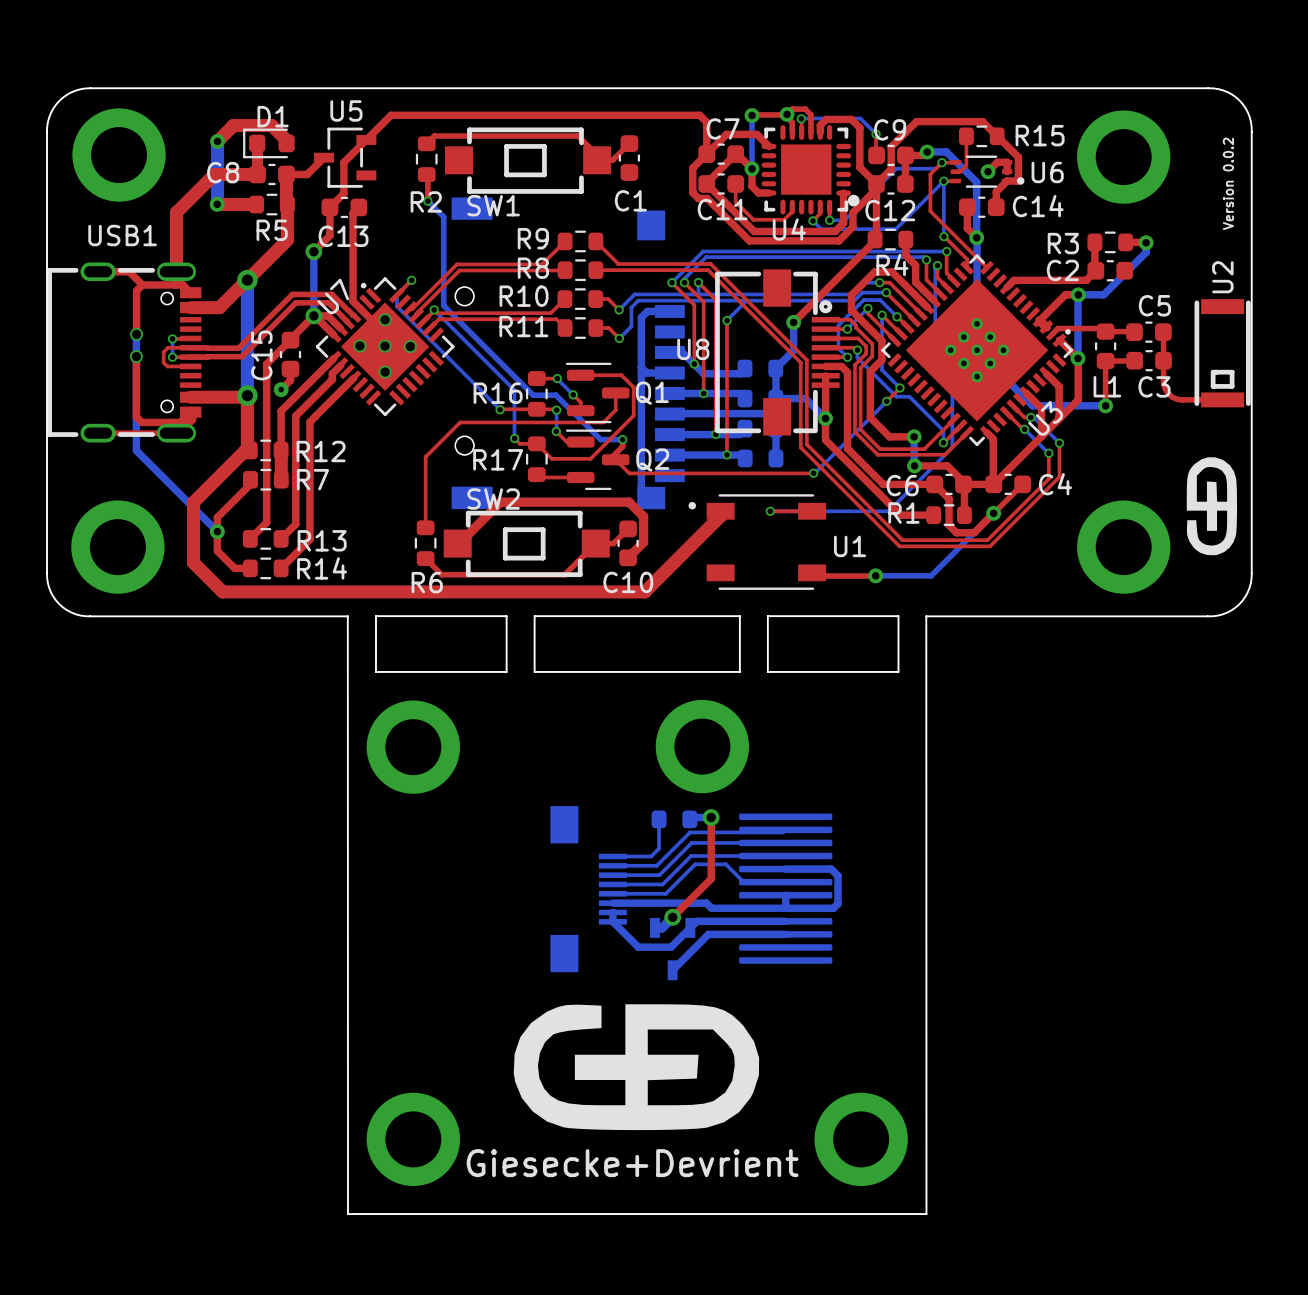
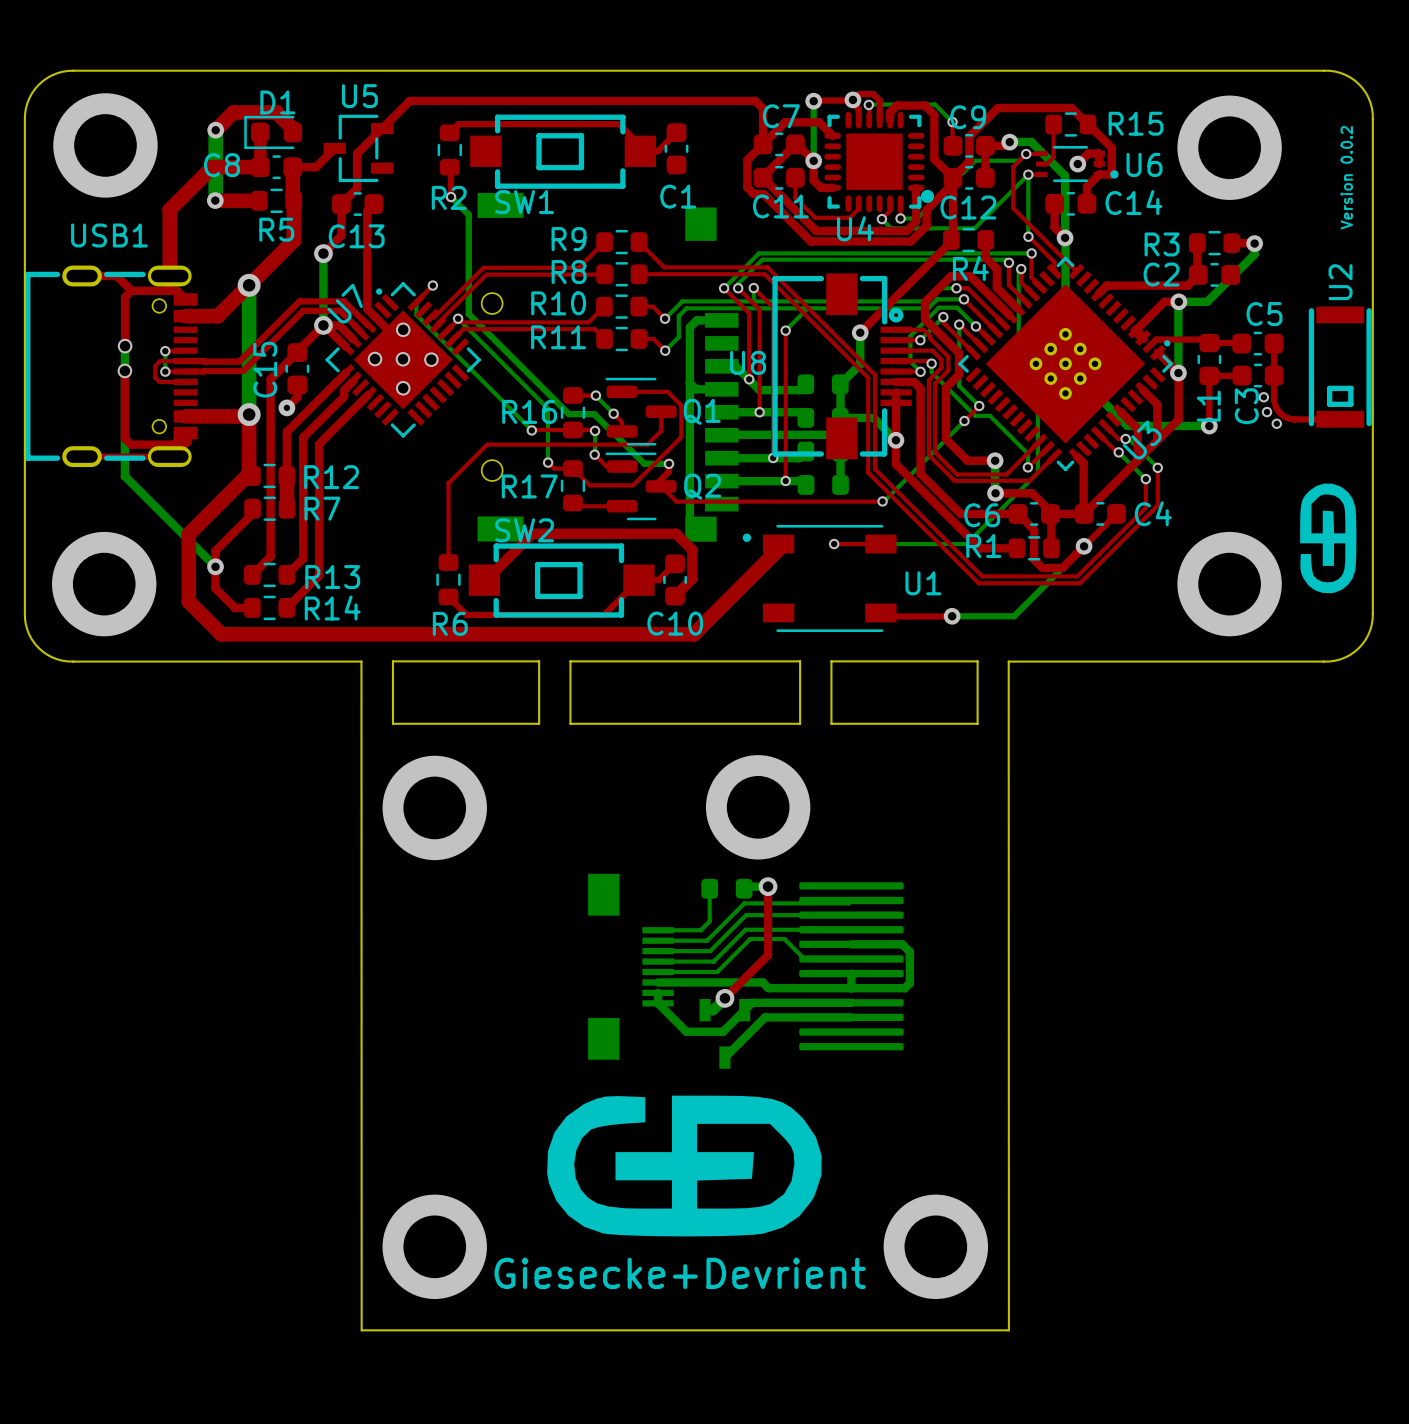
via: none -> (1263, 397)
L1 name rotation: 0° (1107, 386) -> 90° counterclockwise (1208, 406)
C3 name rotation: 0° (1154, 386) -> 90° counterclockwise (1246, 406)
via: none -> (1266, 412)
via: none -> (1276, 423)

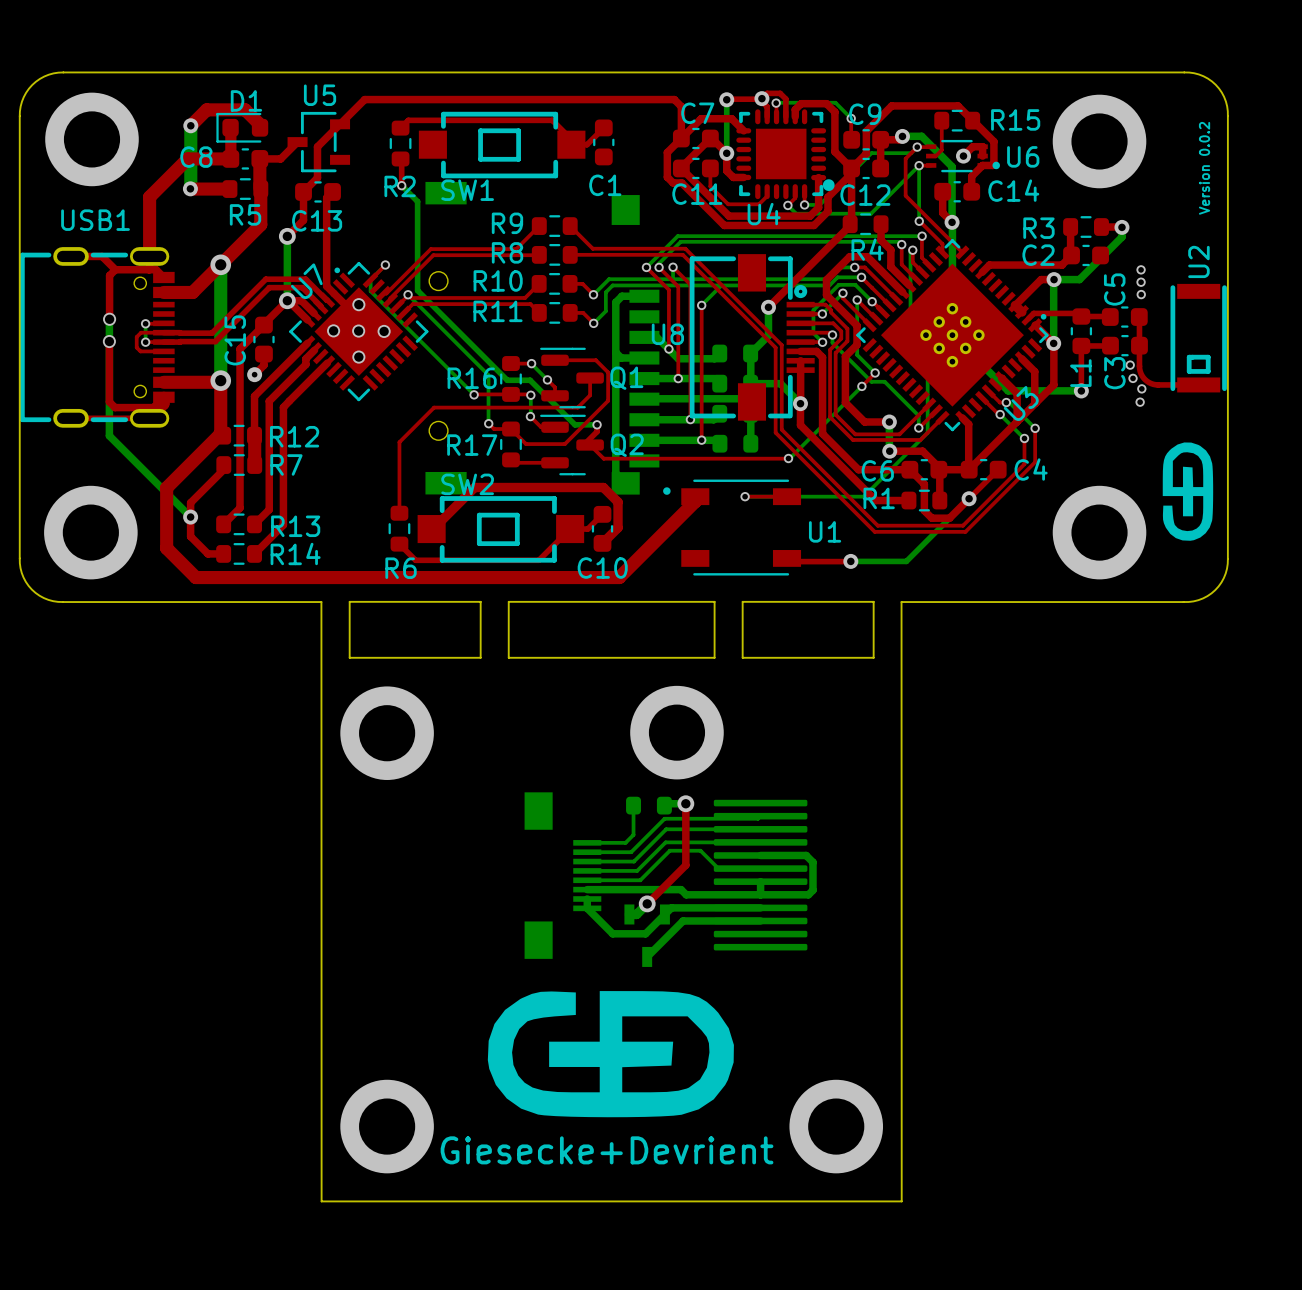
via: none -> (1141, 269)
via: none -> (1141, 282)
C5 name rotation: 0° (1264, 314) -> 90° counterclockwise (1114, 289)
via: none -> (1141, 294)
via: none -> (1140, 402)

